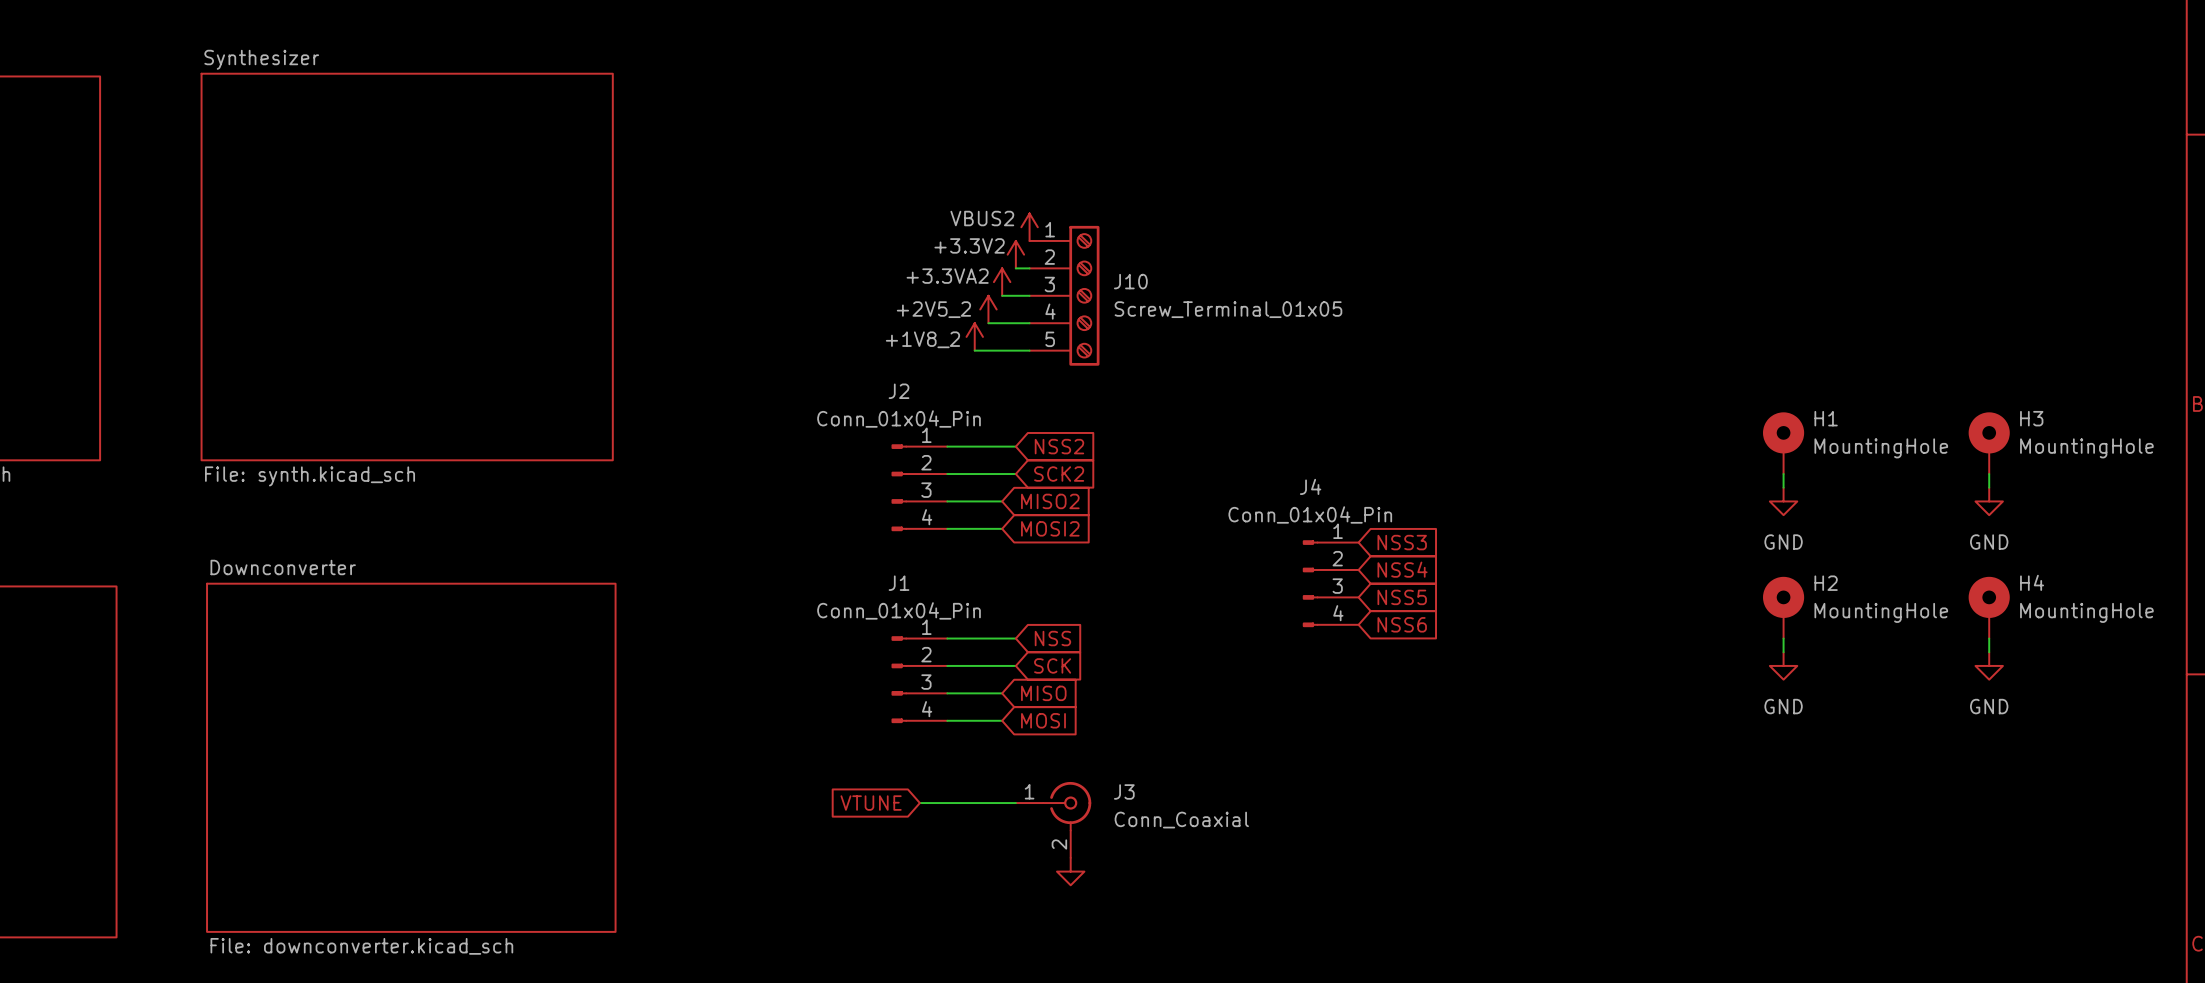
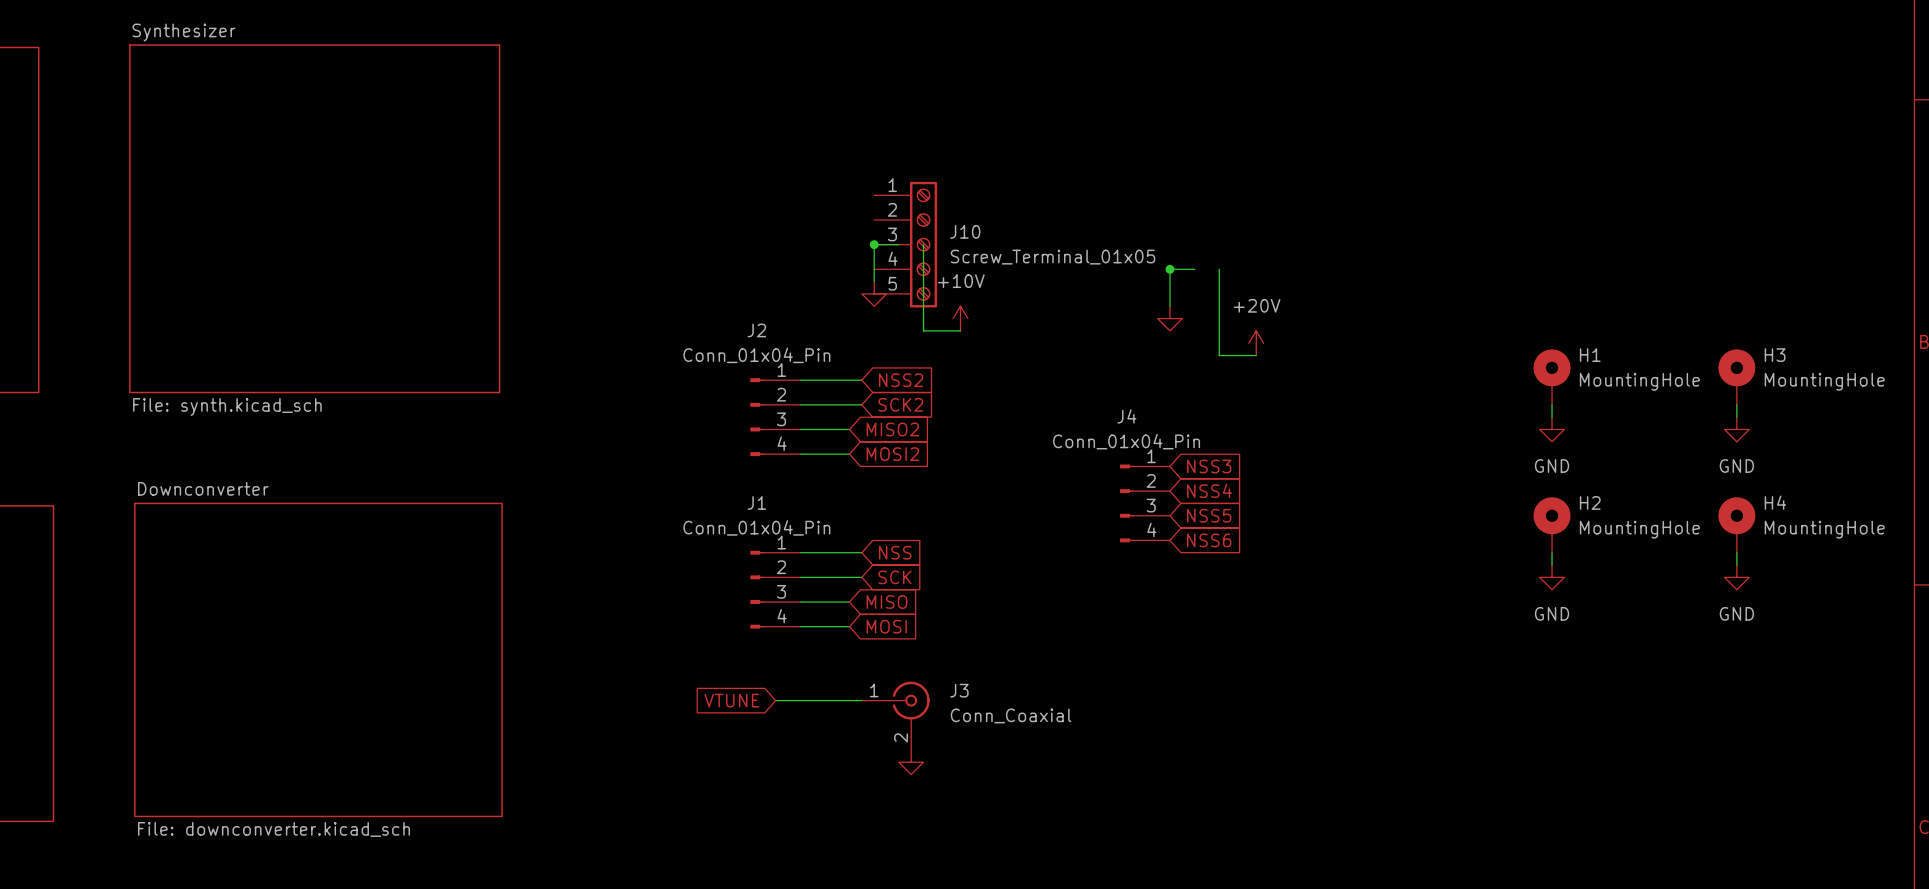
power symbol: VBUS2 (1029, 227) -> none
power symbol: +3.3V2 (1015, 254) -> none
wire: (1015, 268) (1029, 268) -> none
power symbol: +3.3VA2 (1002, 282) -> none
wire: (1002, 295) (1029, 295) -> none
junction: none -> (874, 244)
wire: none -> (898, 244) (874, 244) (874, 281)
wire: none -> (923, 244) (923, 330) (960, 330)
power symbol: +2V5_2 (988, 309) -> none
wire: (988, 323) (1029, 323) -> none
junction: none -> (1169, 269)
wire: none -> (1194, 269) (1169, 269) (1169, 306)
wire: none -> (1219, 269) (1219, 355) (1256, 355)
power symbol: +1V8_2 (974, 336) -> none
wire: (974, 350) (1029, 350) -> none
power symbol: none -> (874, 293)
power symbol: none -> +10V (960, 318)
power symbol: none -> (1169, 318)
power symbol: none -> +20V (1256, 343)

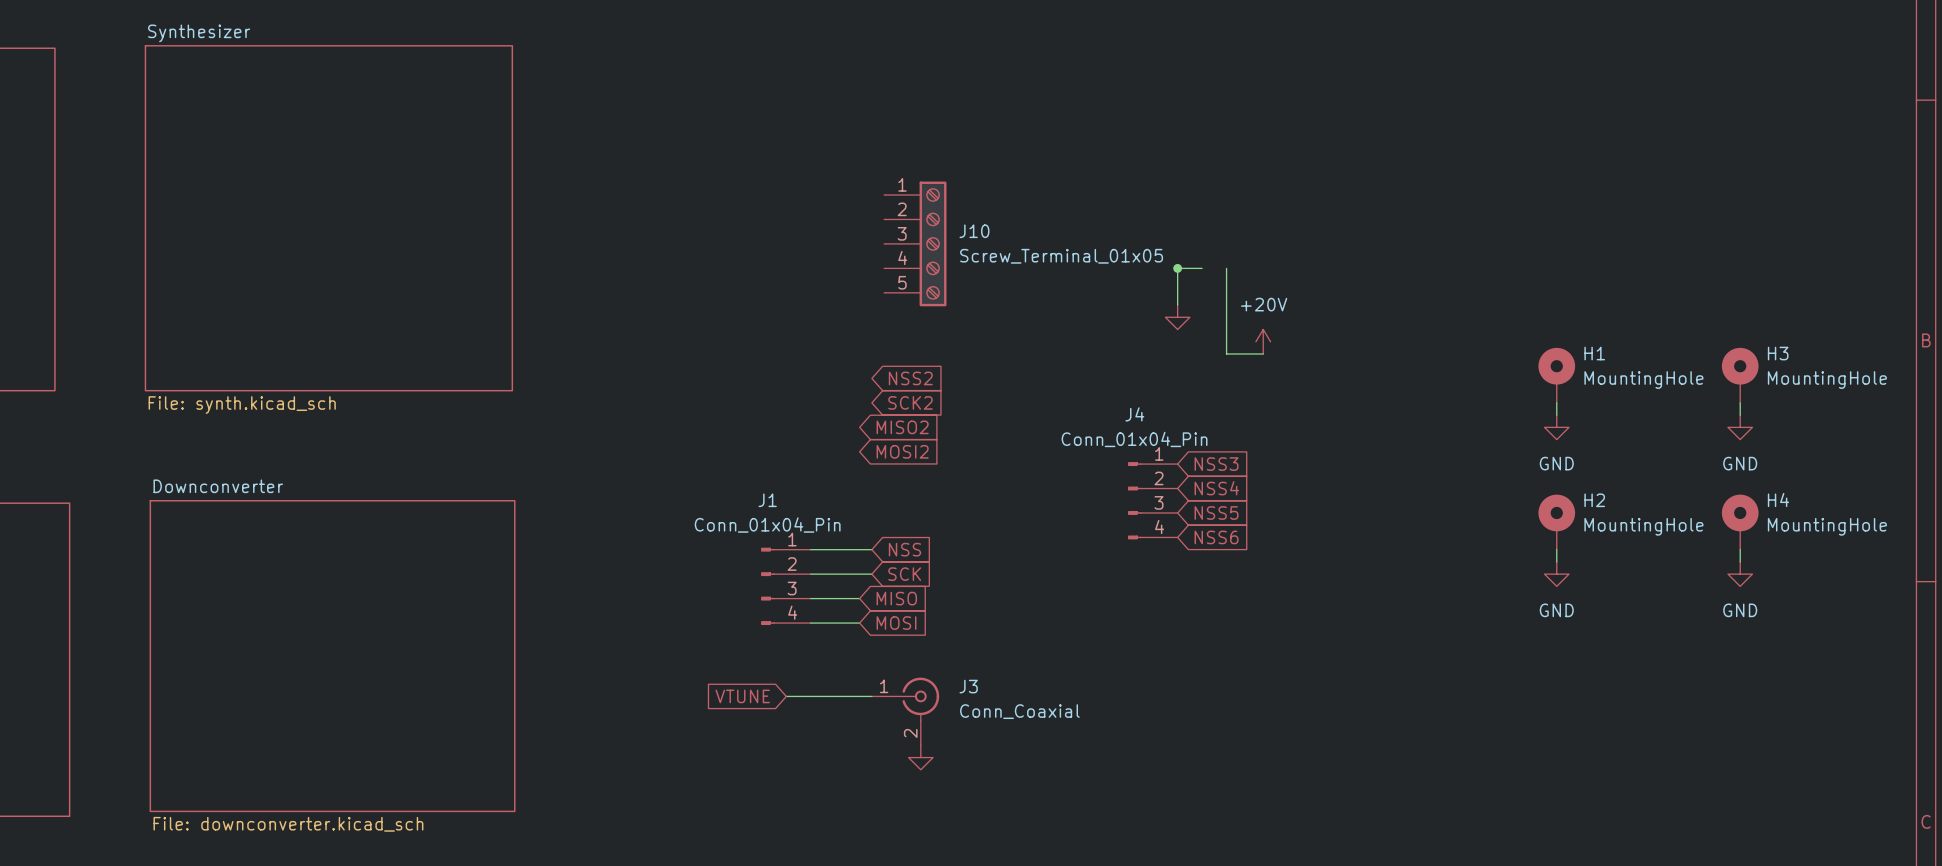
junction: (874, 244) -> none
wire: (898, 244) (874, 244) (874, 281) -> none
wire: (923, 244) (923, 330) (960, 330) -> none
power symbol: (874, 293) -> none
power symbol: +10V (960, 318) -> none
wire: (800, 380) (861, 380) -> none
wire: (800, 404) (861, 404) -> none
J2: Conn_01x04_Pin (775, 417) -> none
wire: (800, 429) (849, 429) -> none
wire: (800, 454) (849, 454) -> none

